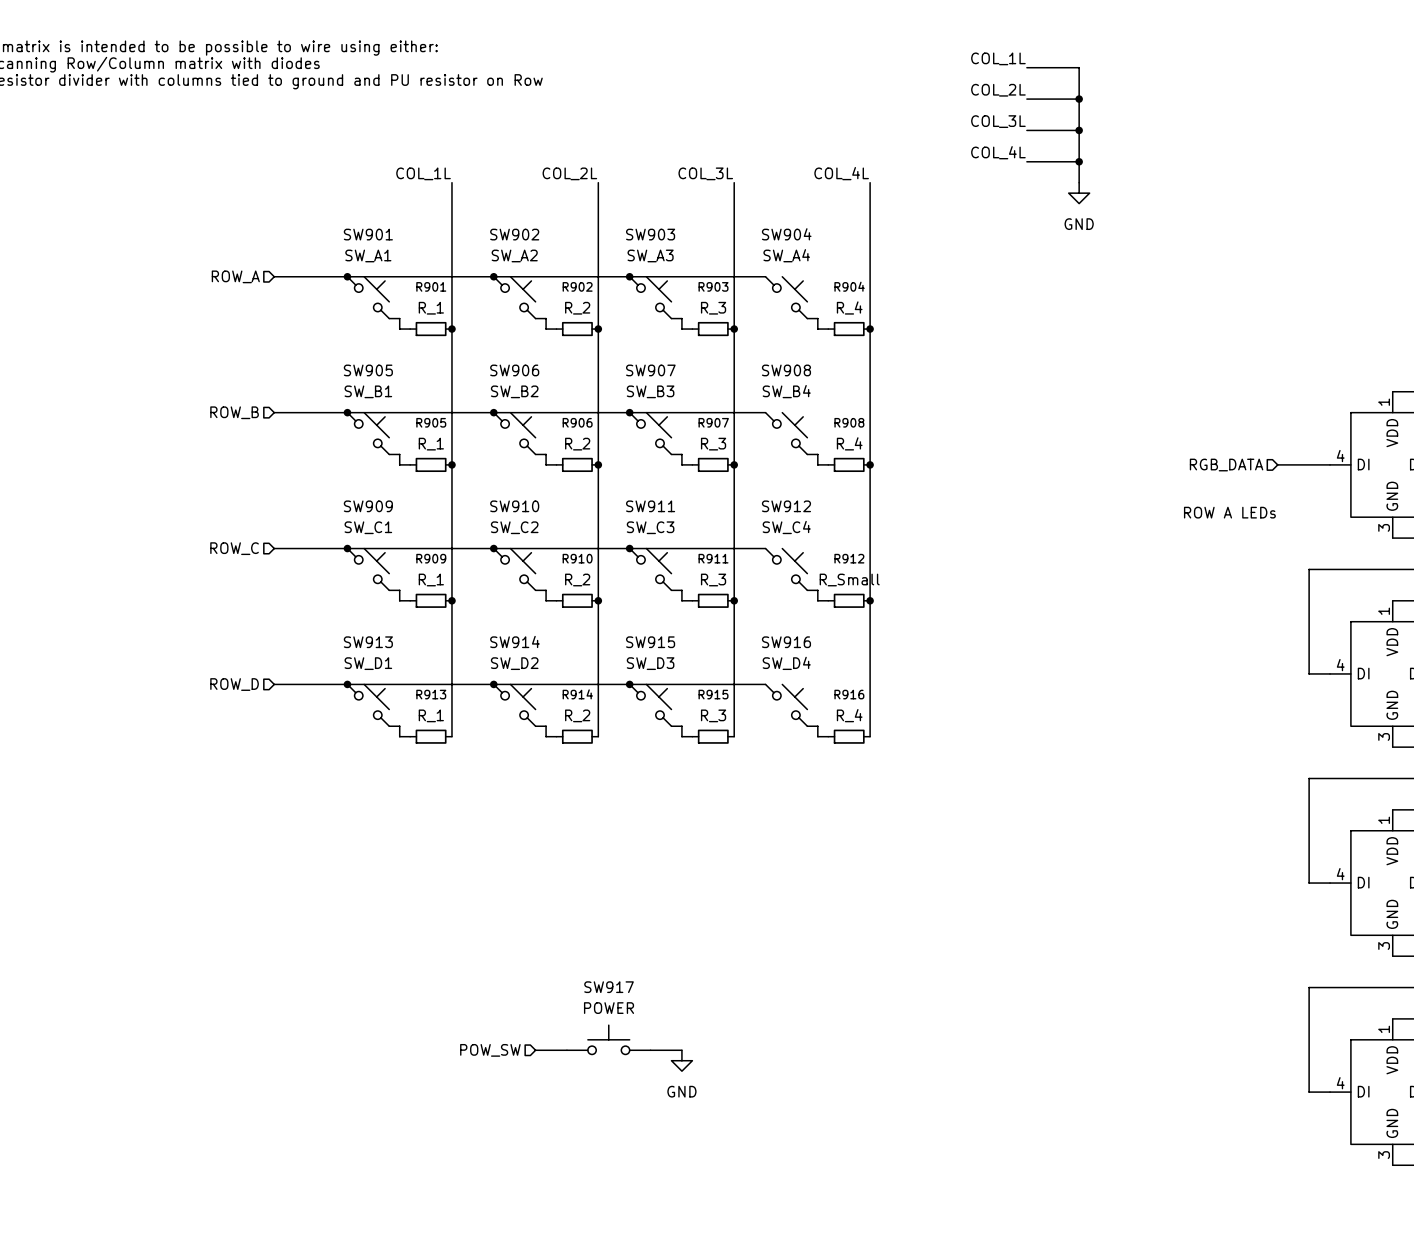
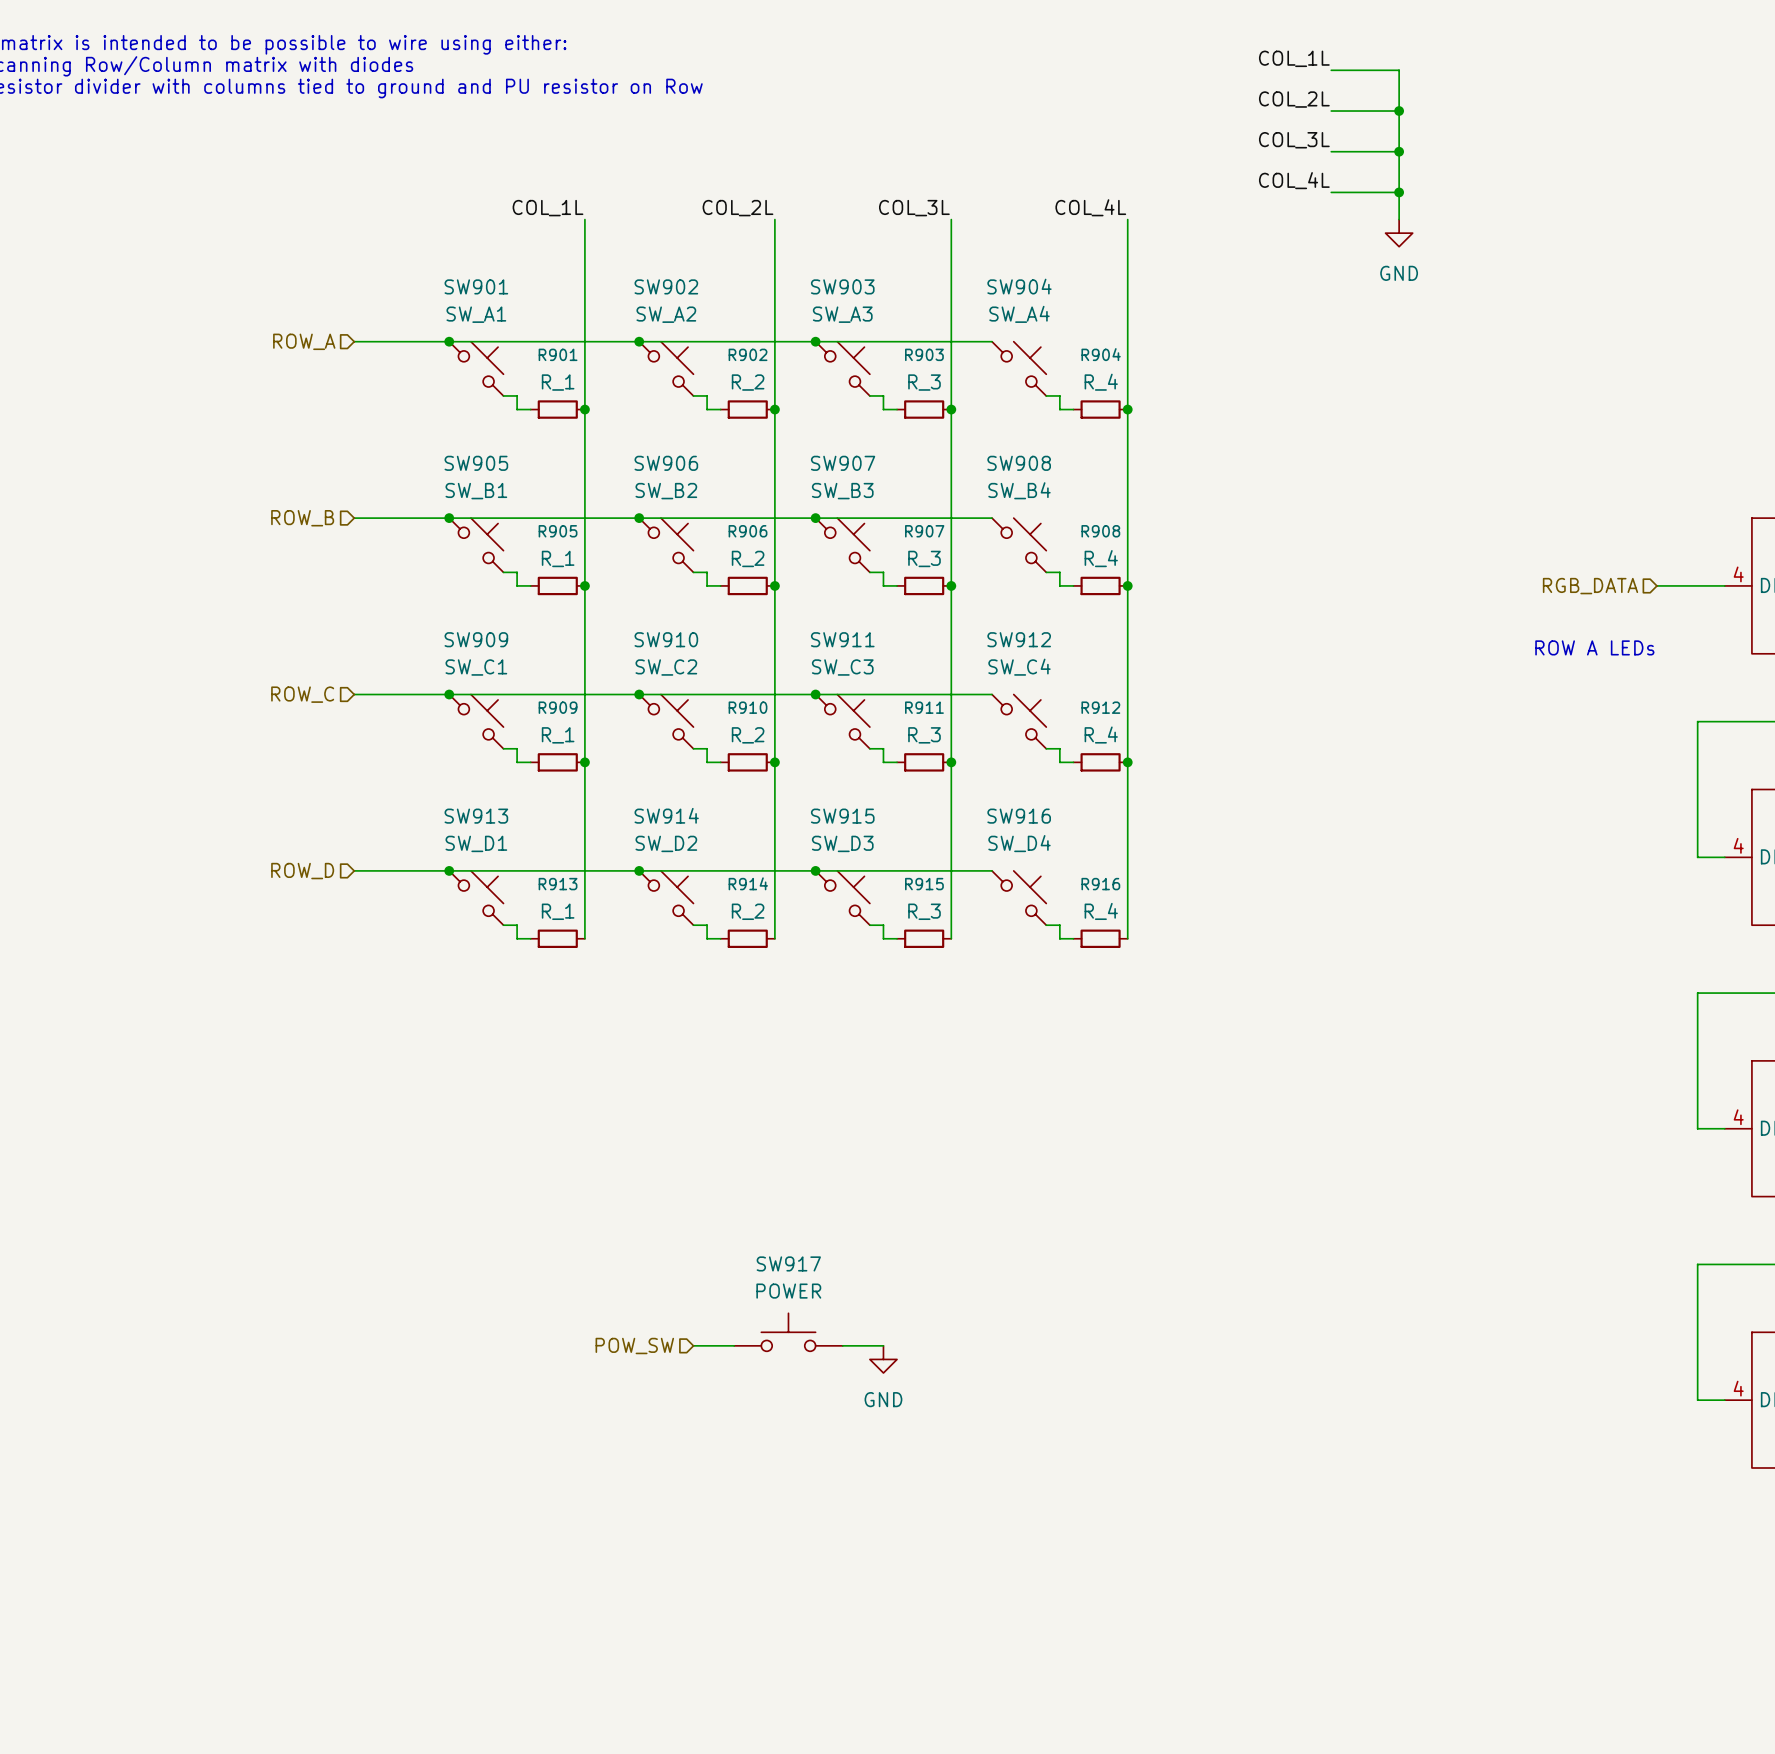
R912 value: R_Small (849, 580) -> R_4 (1101, 735)

